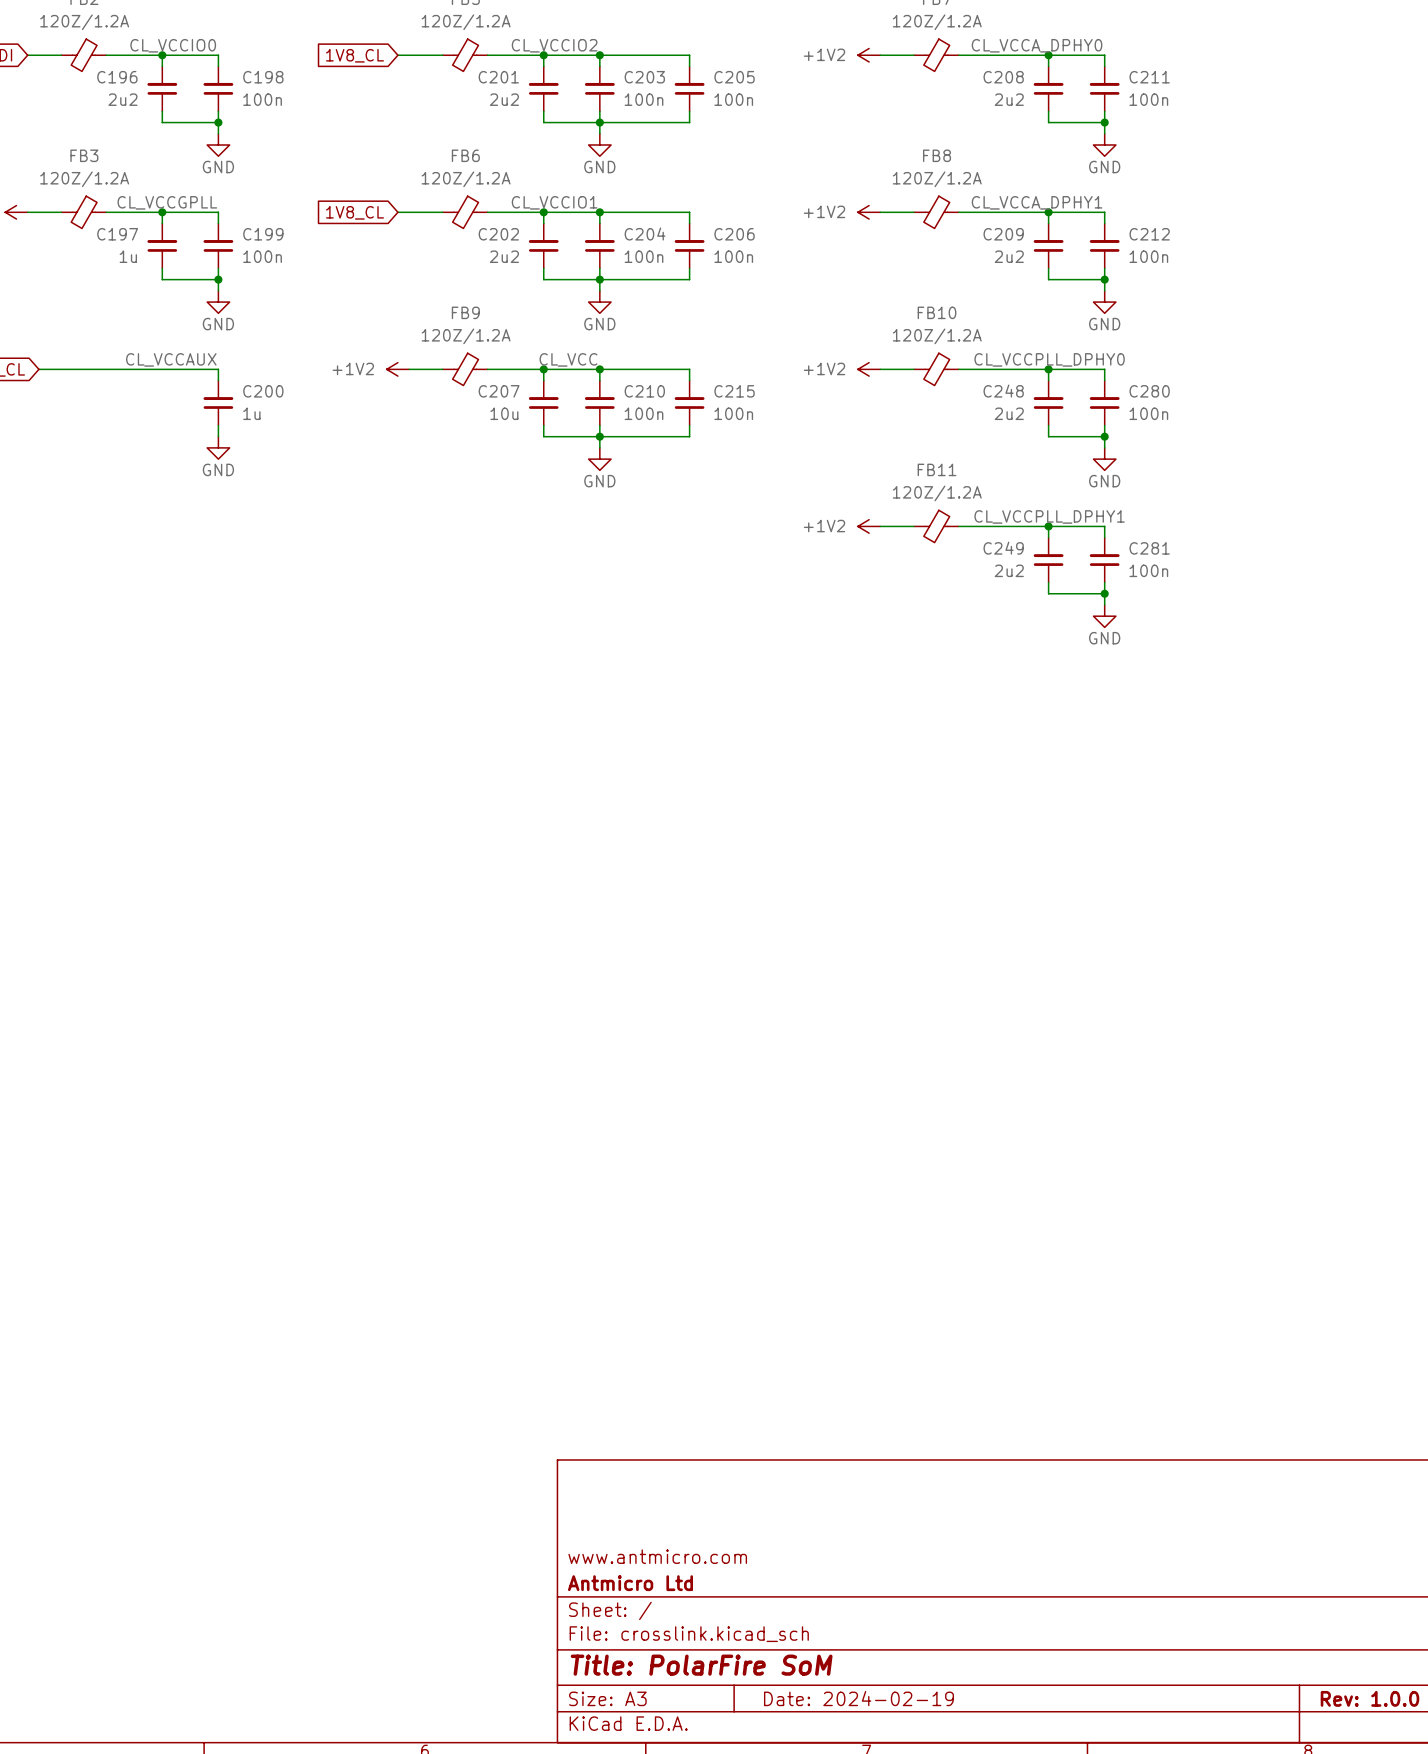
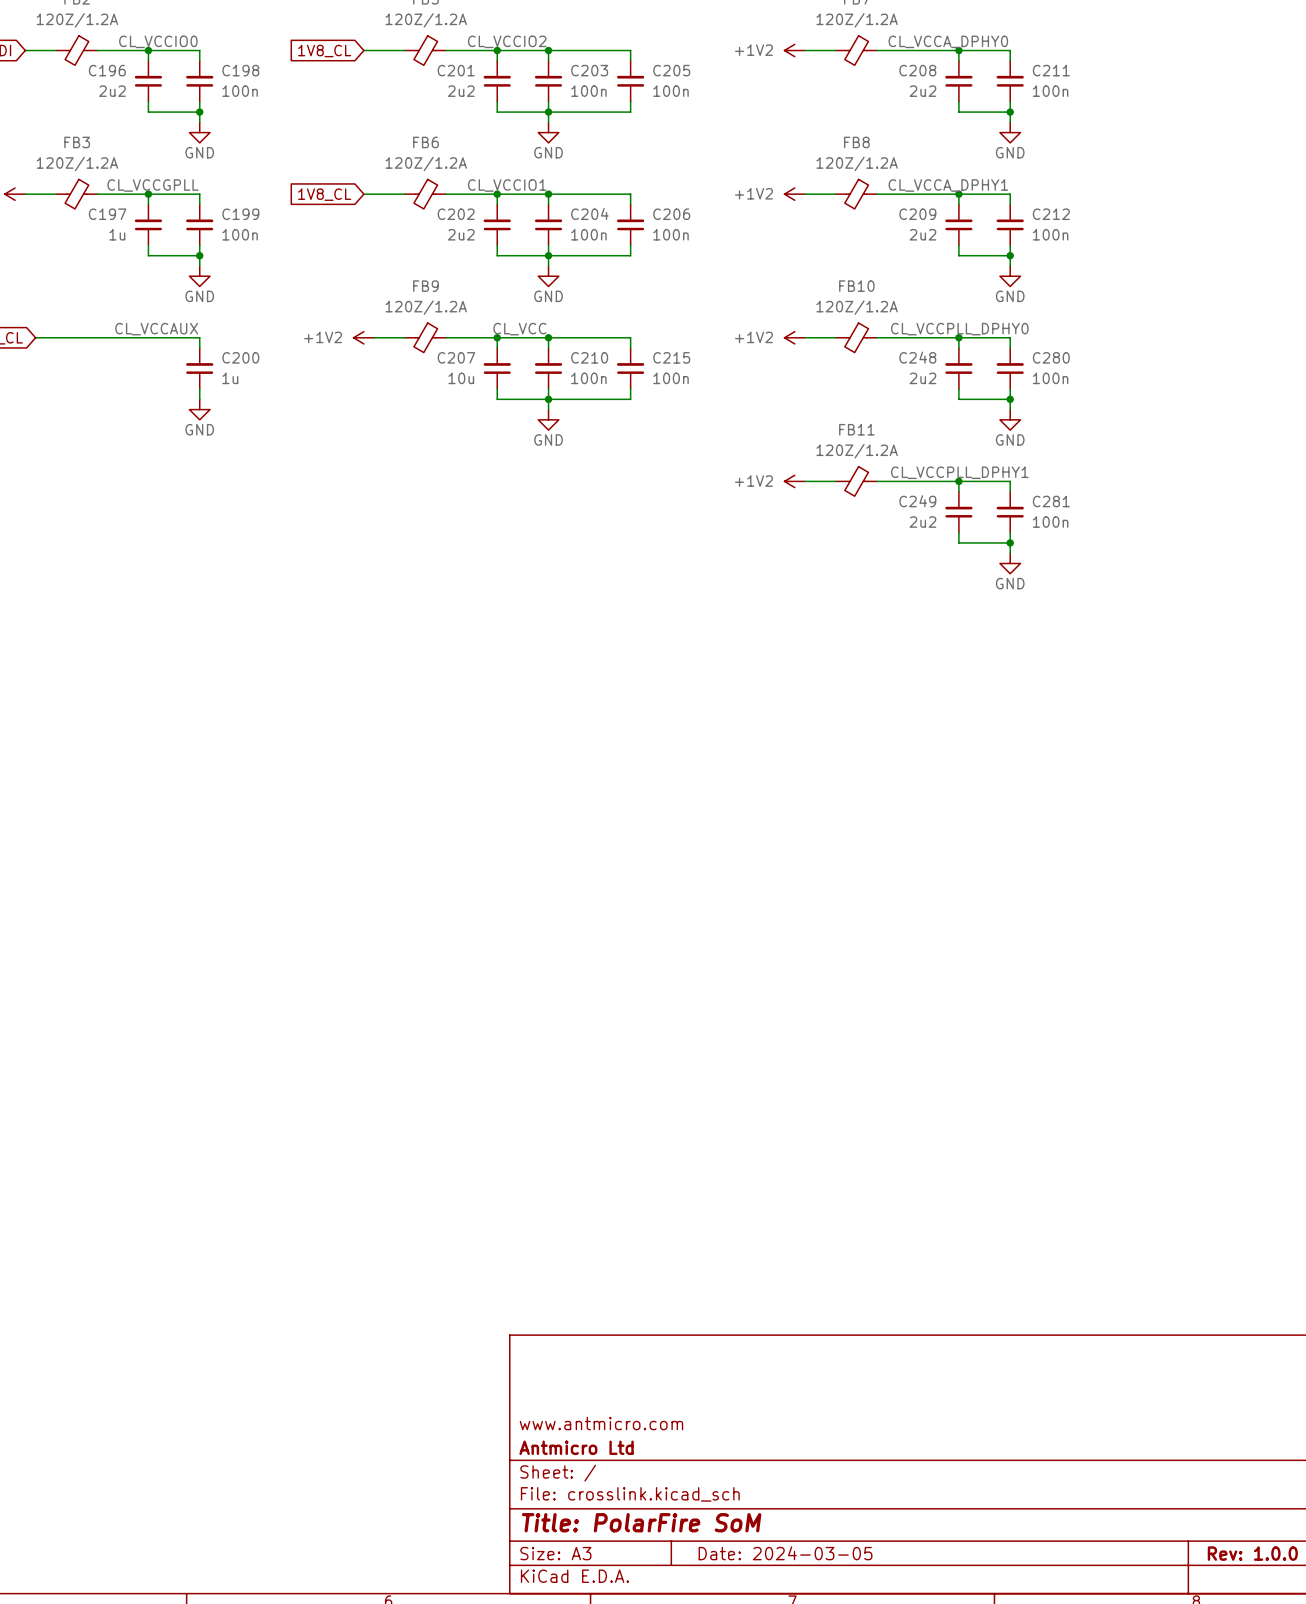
title block: Date: 2024-02-19 (858, 1698) -> Date: 2024-03-05 (785, 1553)

